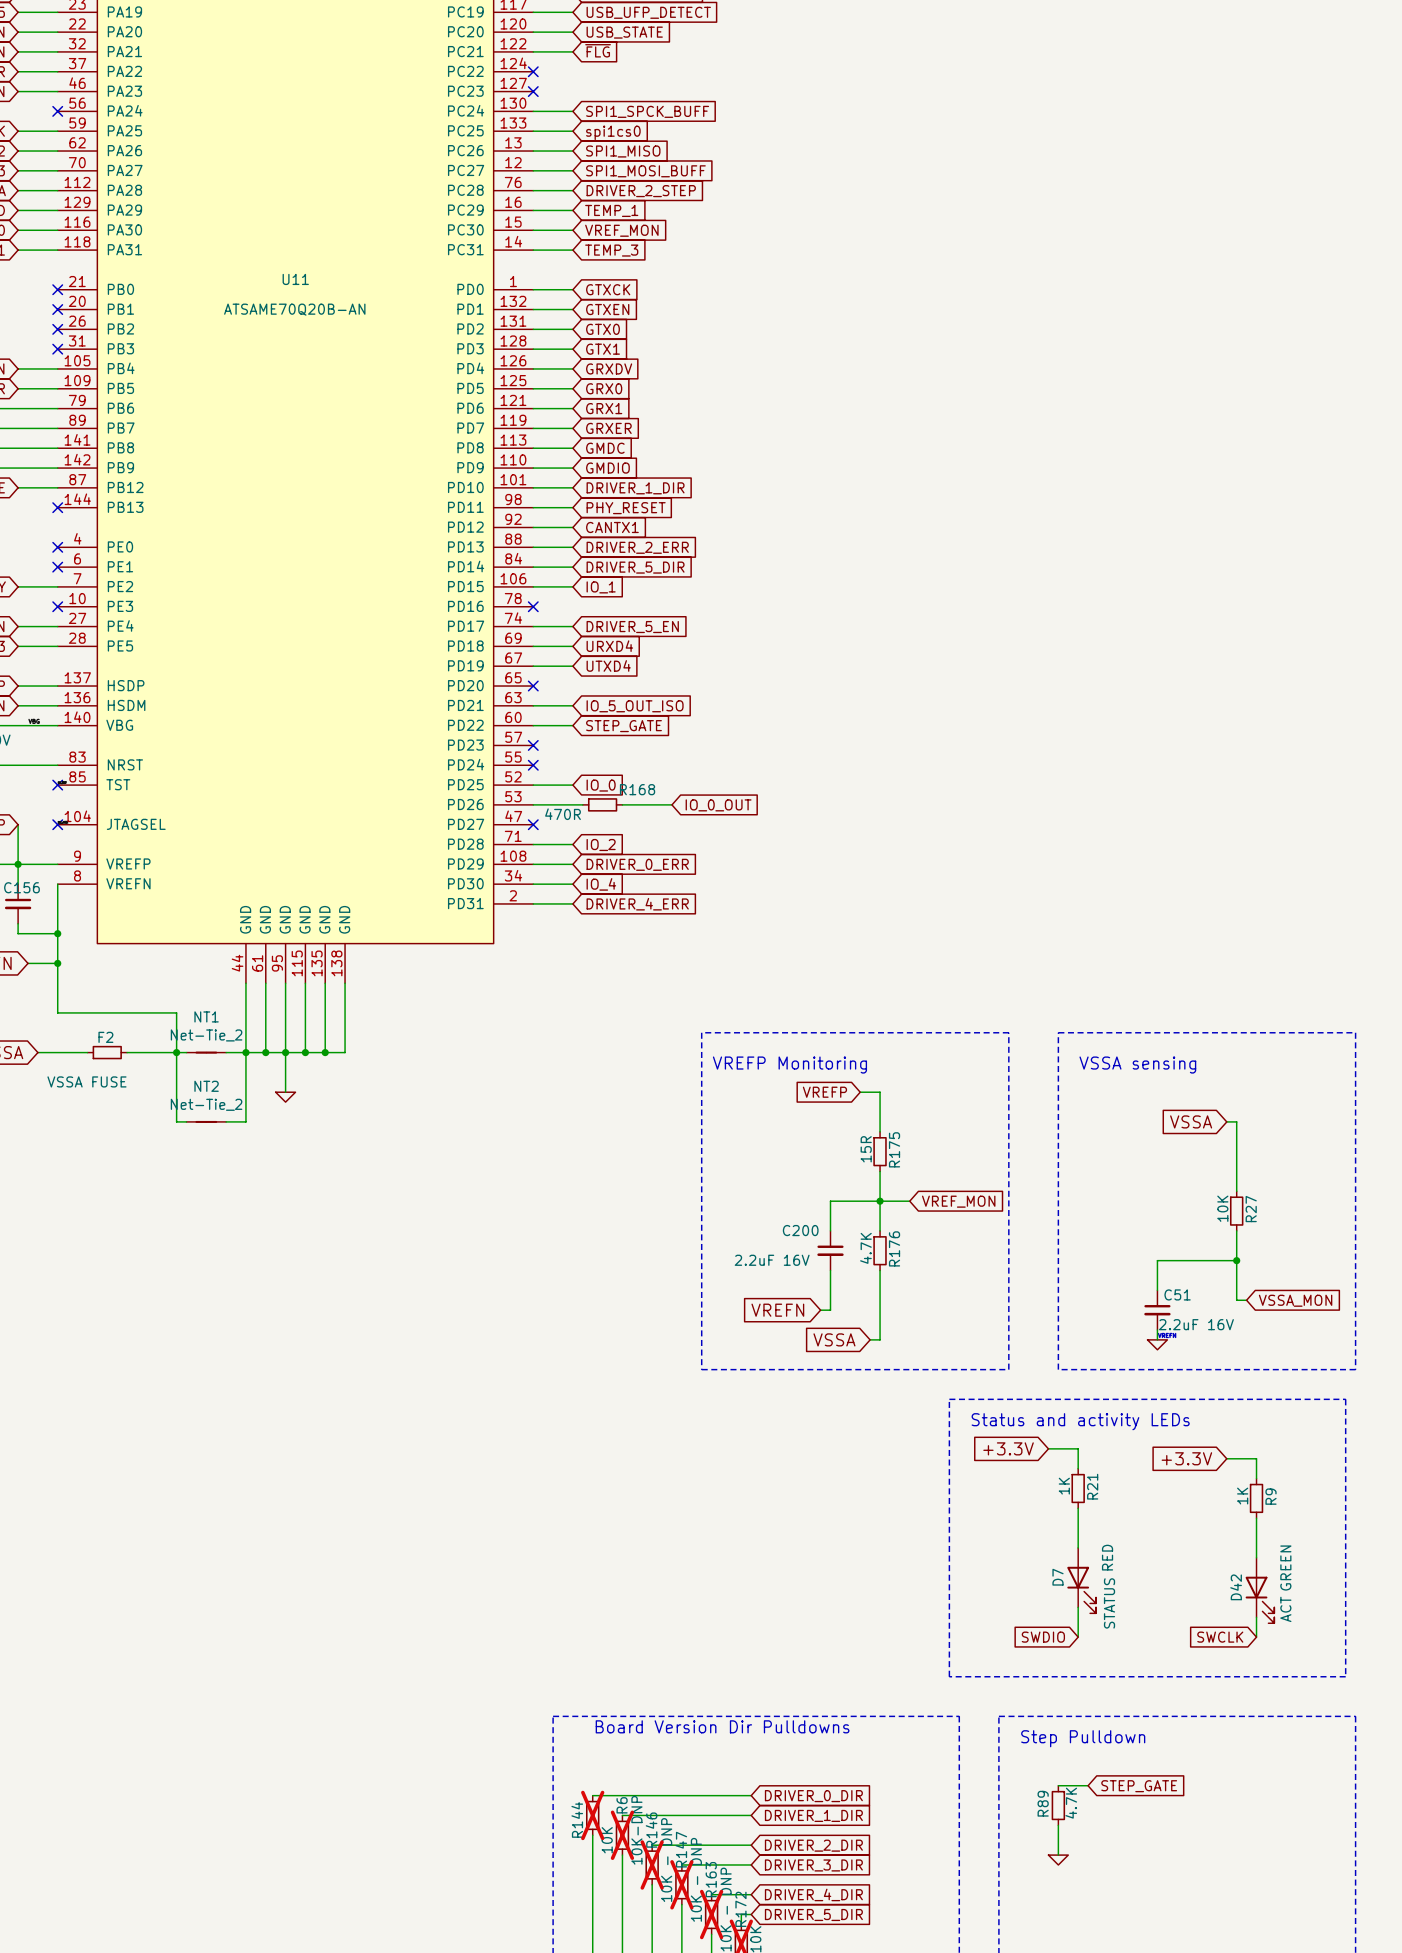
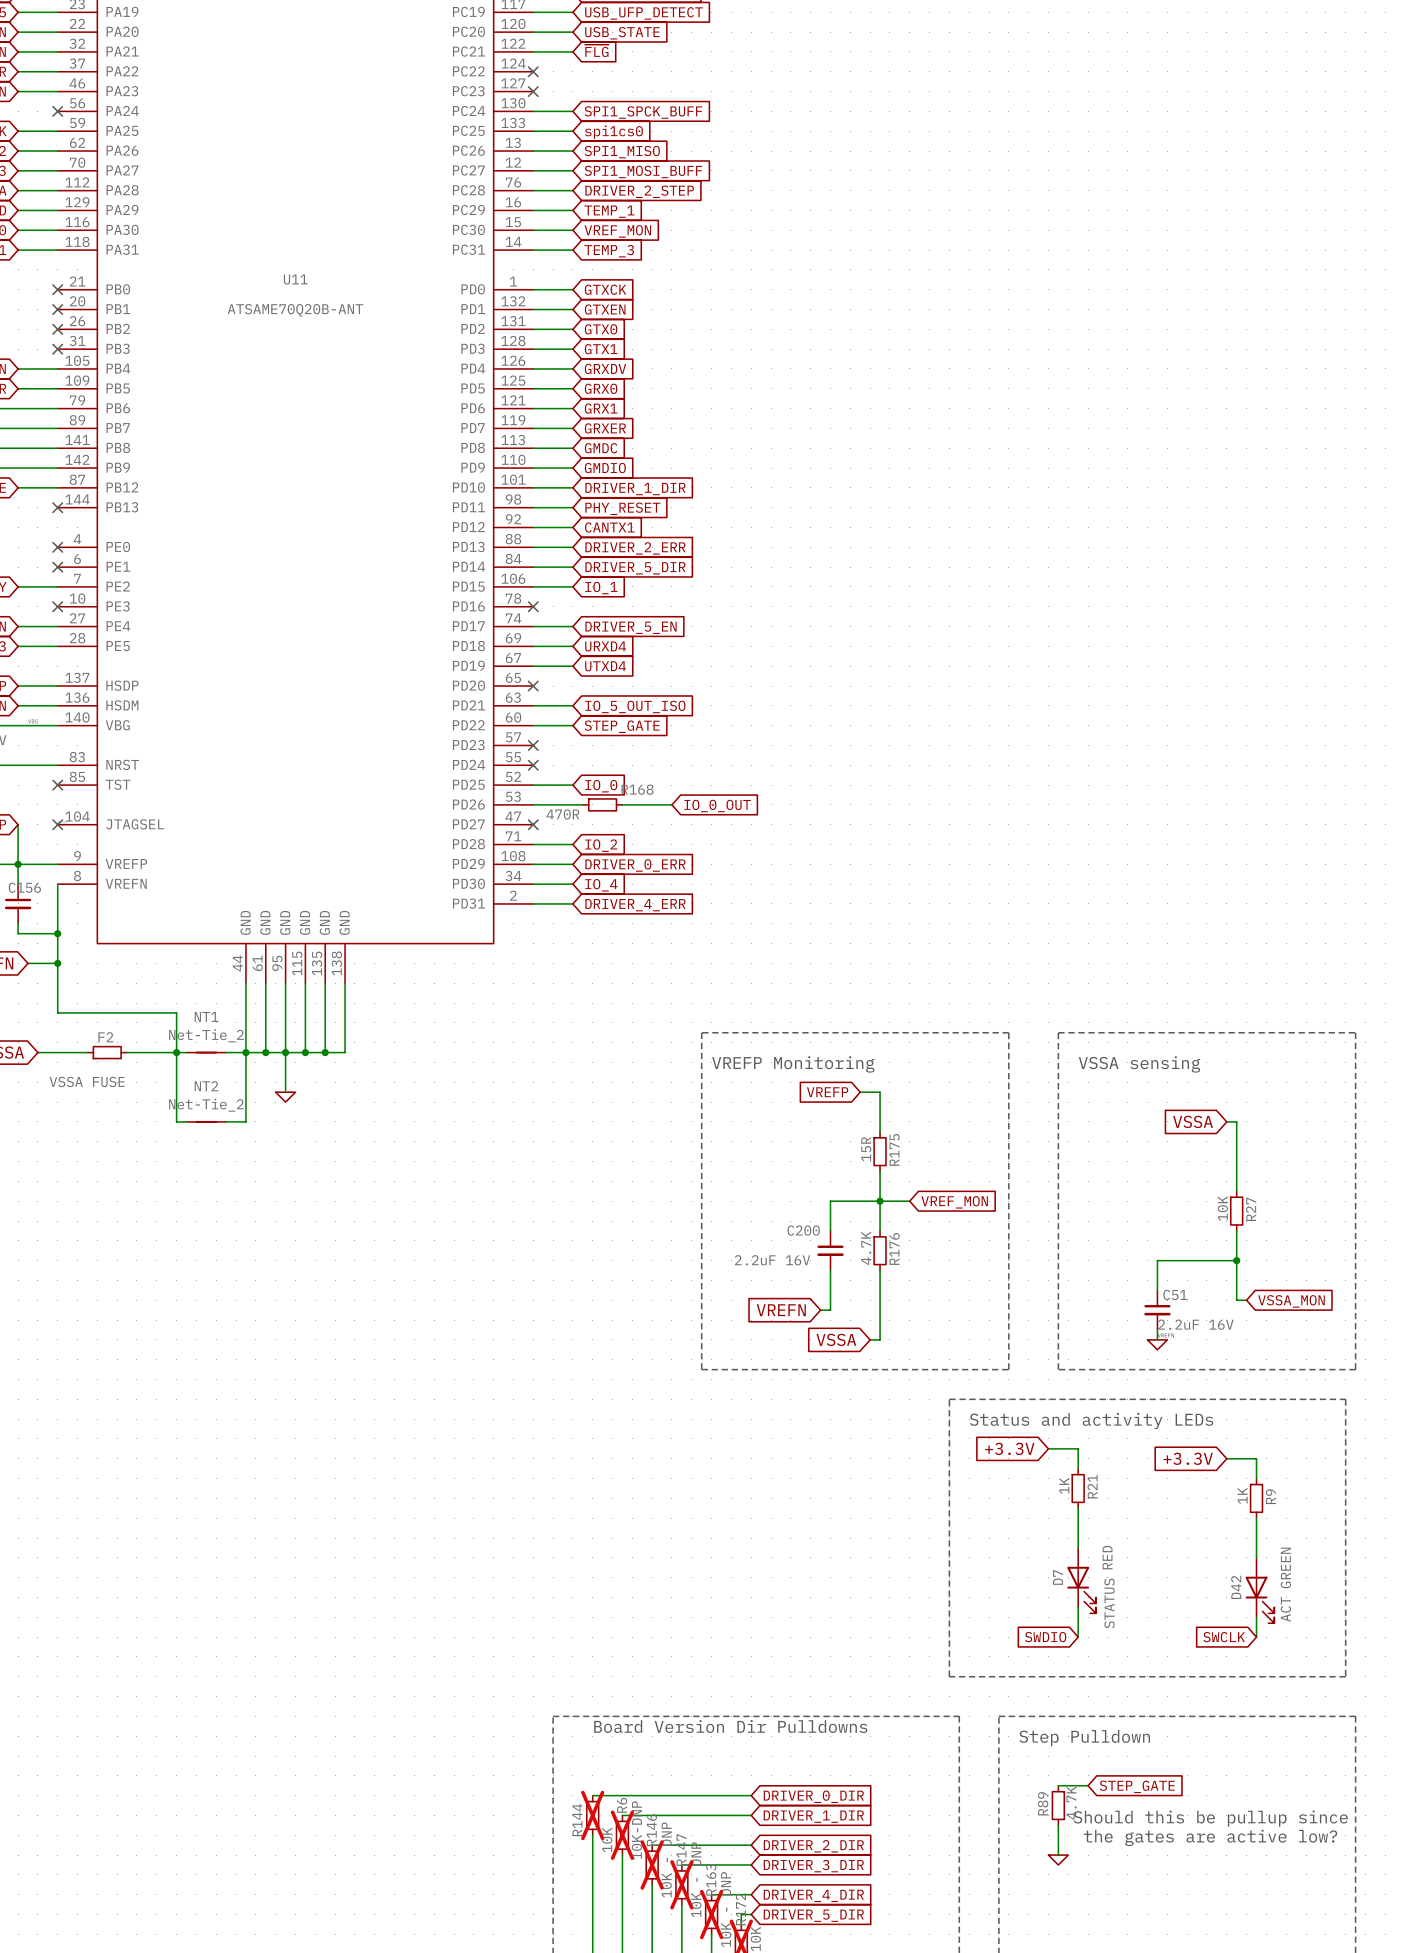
U11 value: ATSAME70Q20B-AN (294, 309) -> ATSAME70Q20B-ANT (295, 310)
text: none -> Should this be pullup since (1210, 1818)
text: none -> the gates are active low? (1210, 1837)

